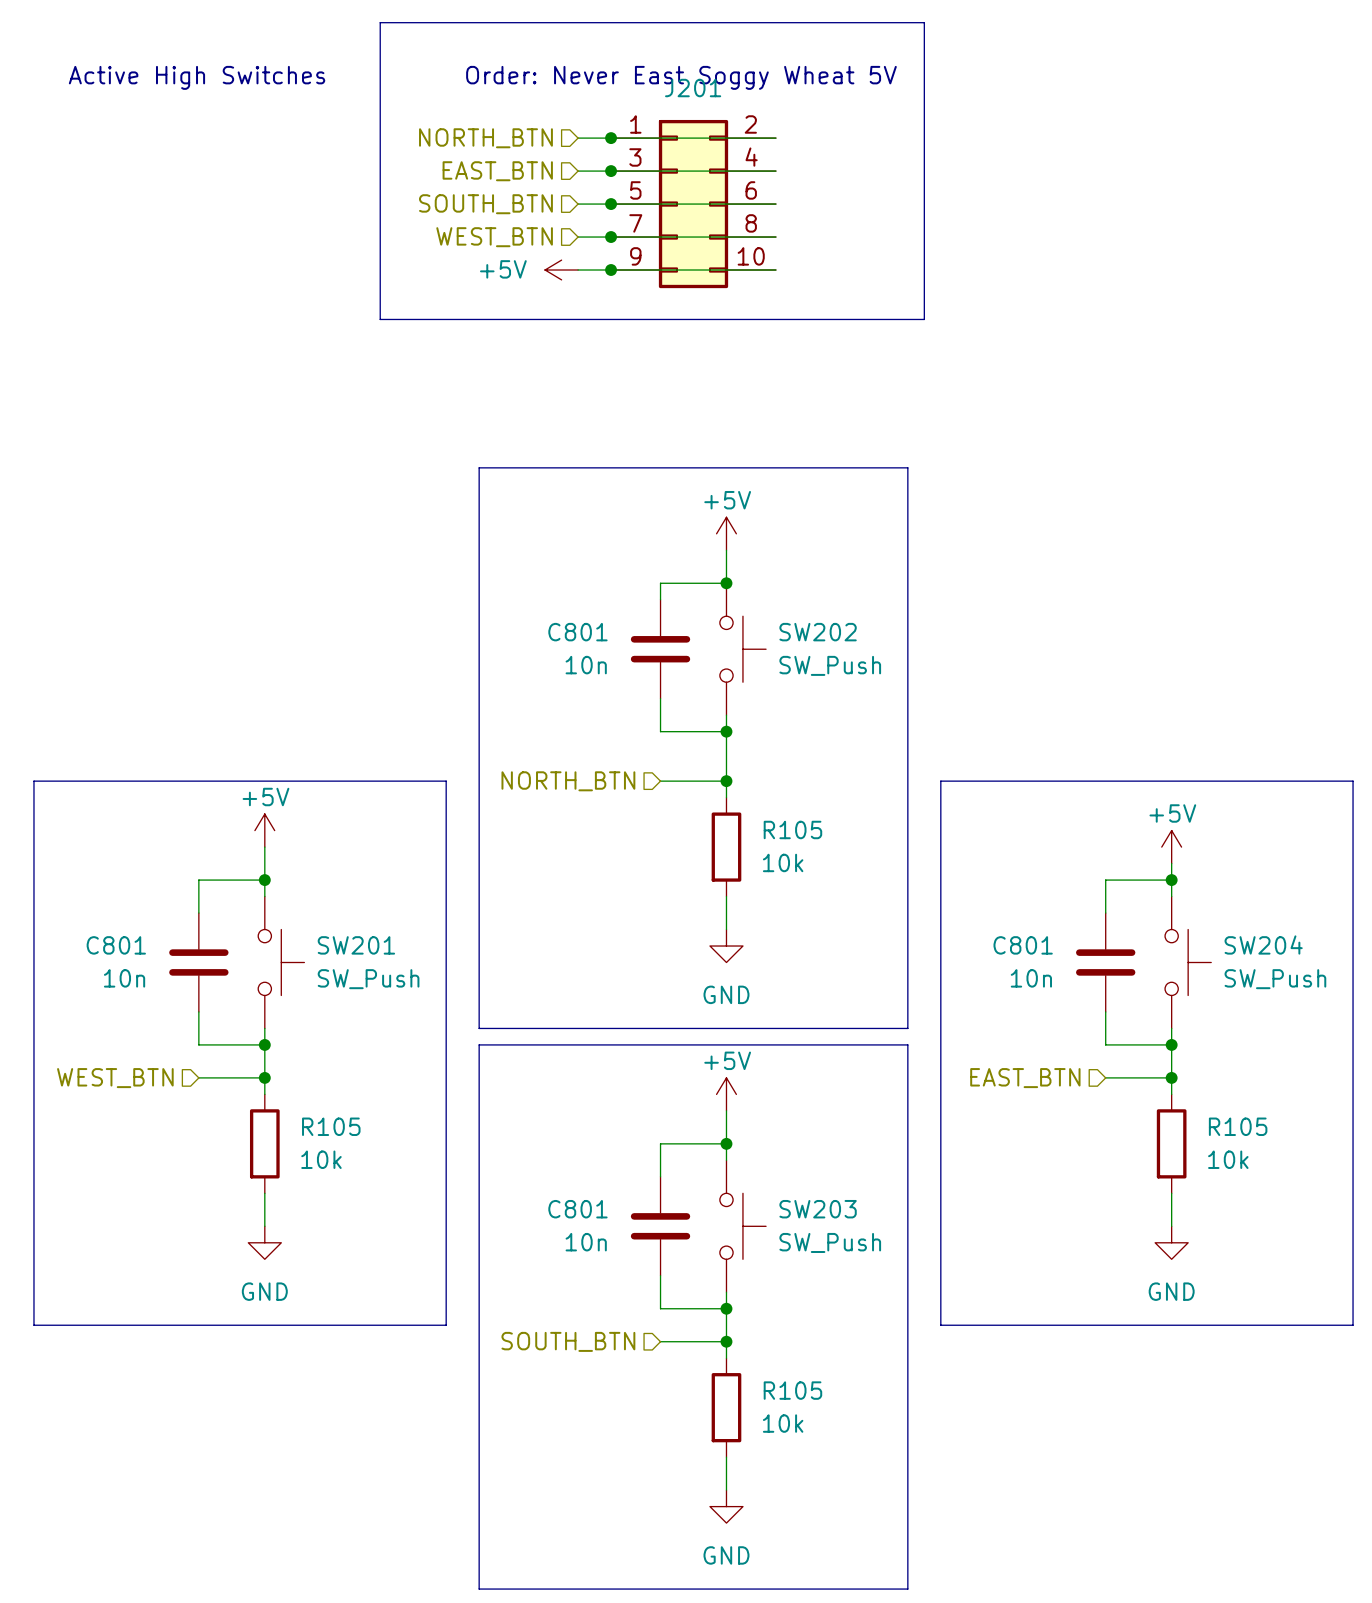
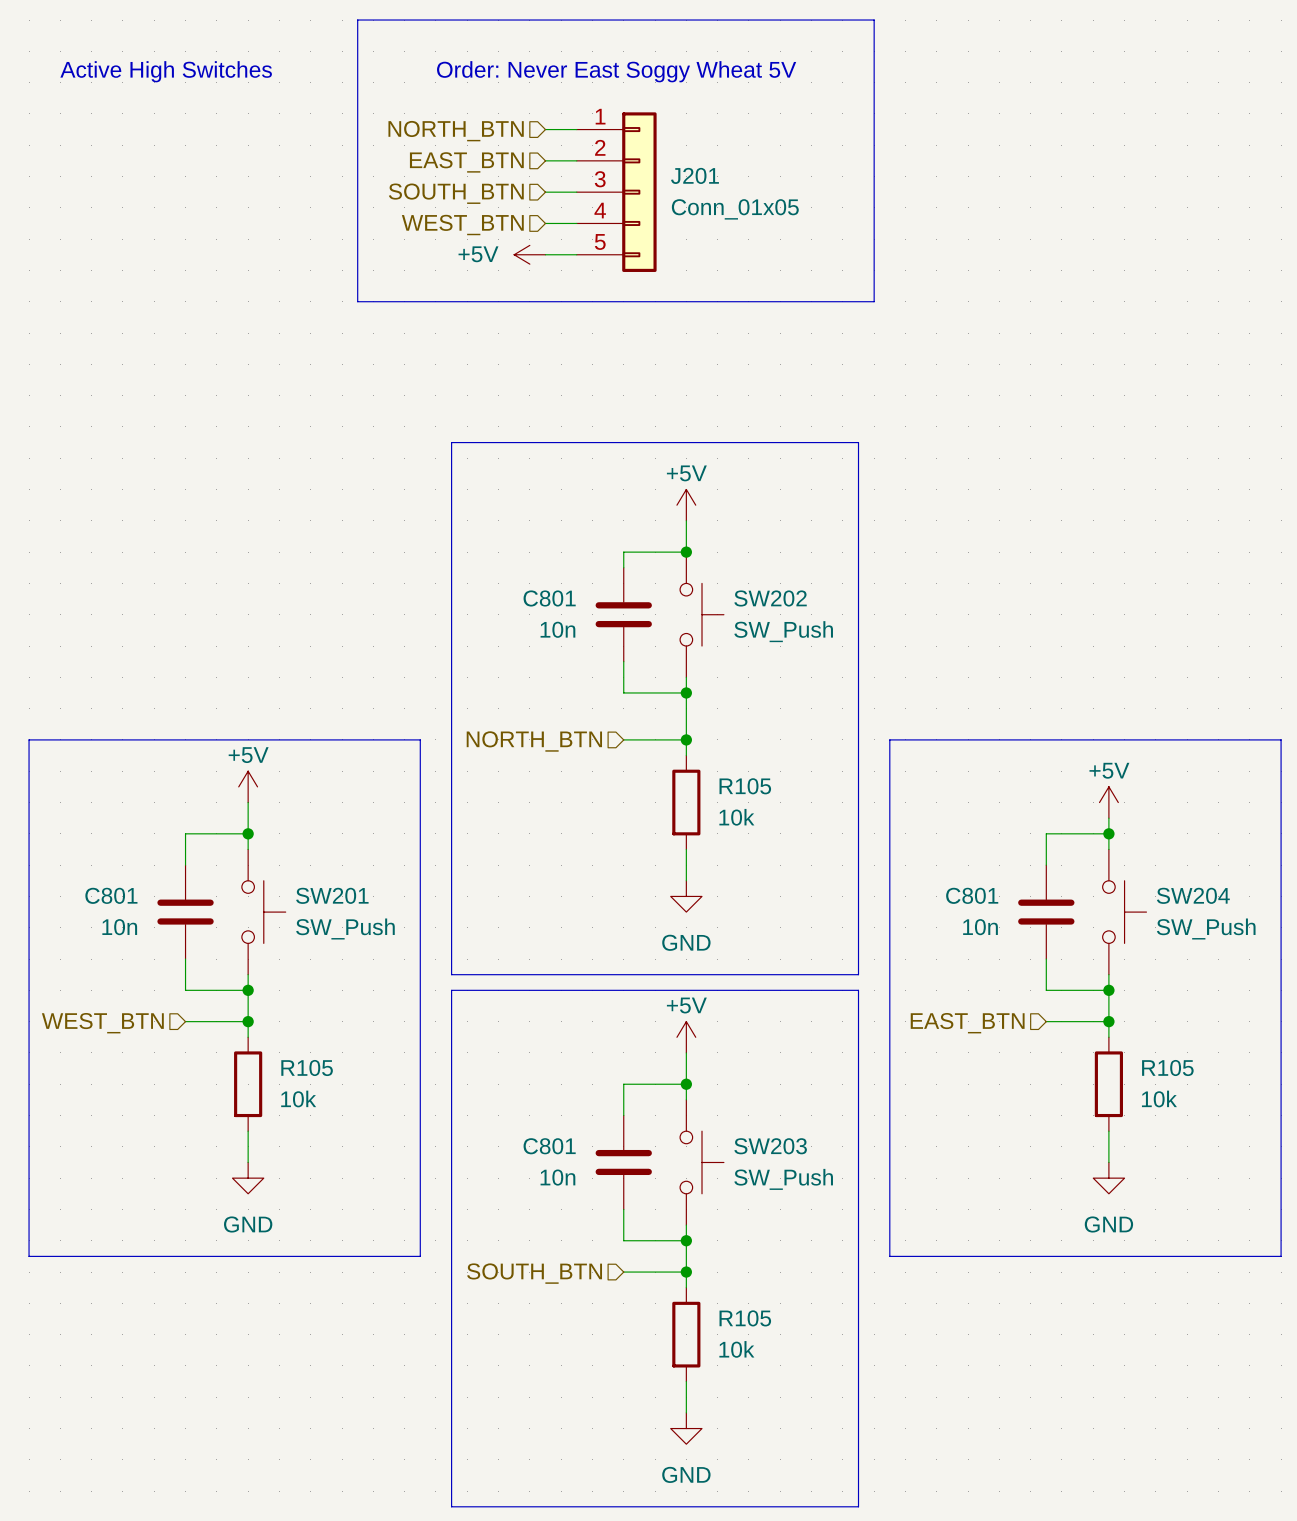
J201 name position: J201 (693, 88) -> J201 (694, 175)
J201 symbol: [611, 119, 776, 289] -> [576, 112, 657, 272]
junction: (611, 138) -> none
junction: (611, 171) -> none
junction: (611, 204) -> none
J201 value: none -> Conn_01x05 (735, 209)
junction: (611, 237) -> none
junction: (611, 270) -> none

